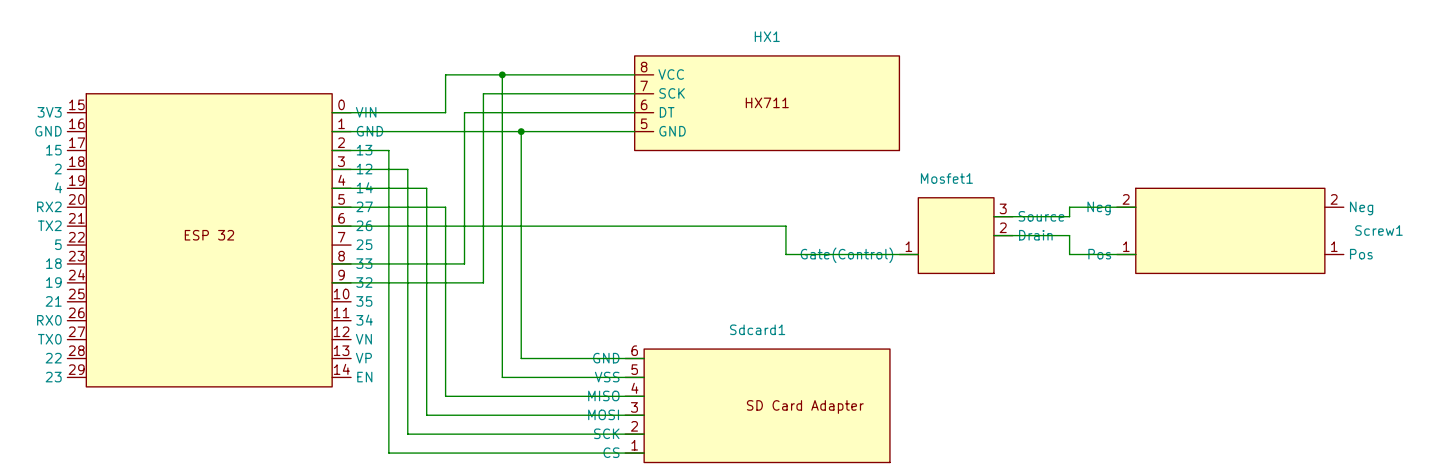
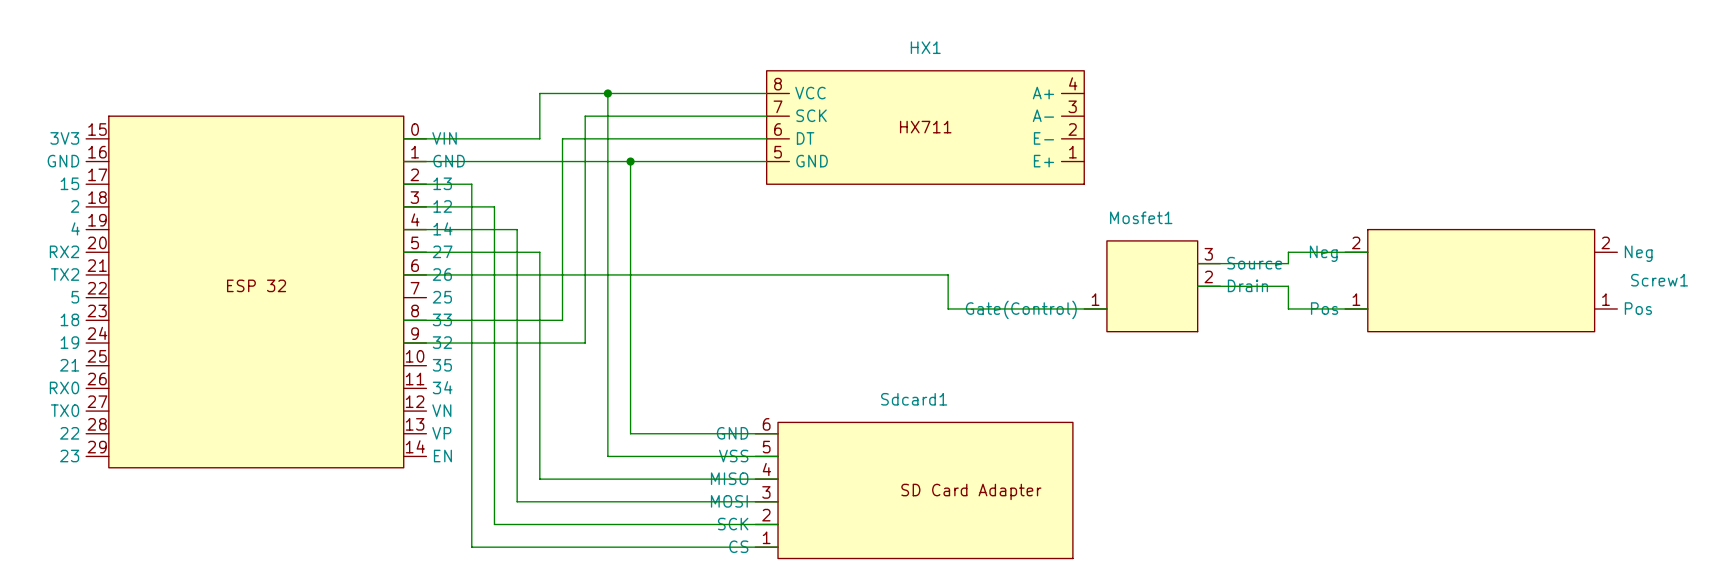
HX1 symbol: [634, 55, 900, 151] -> [766, 70, 1085, 185]

